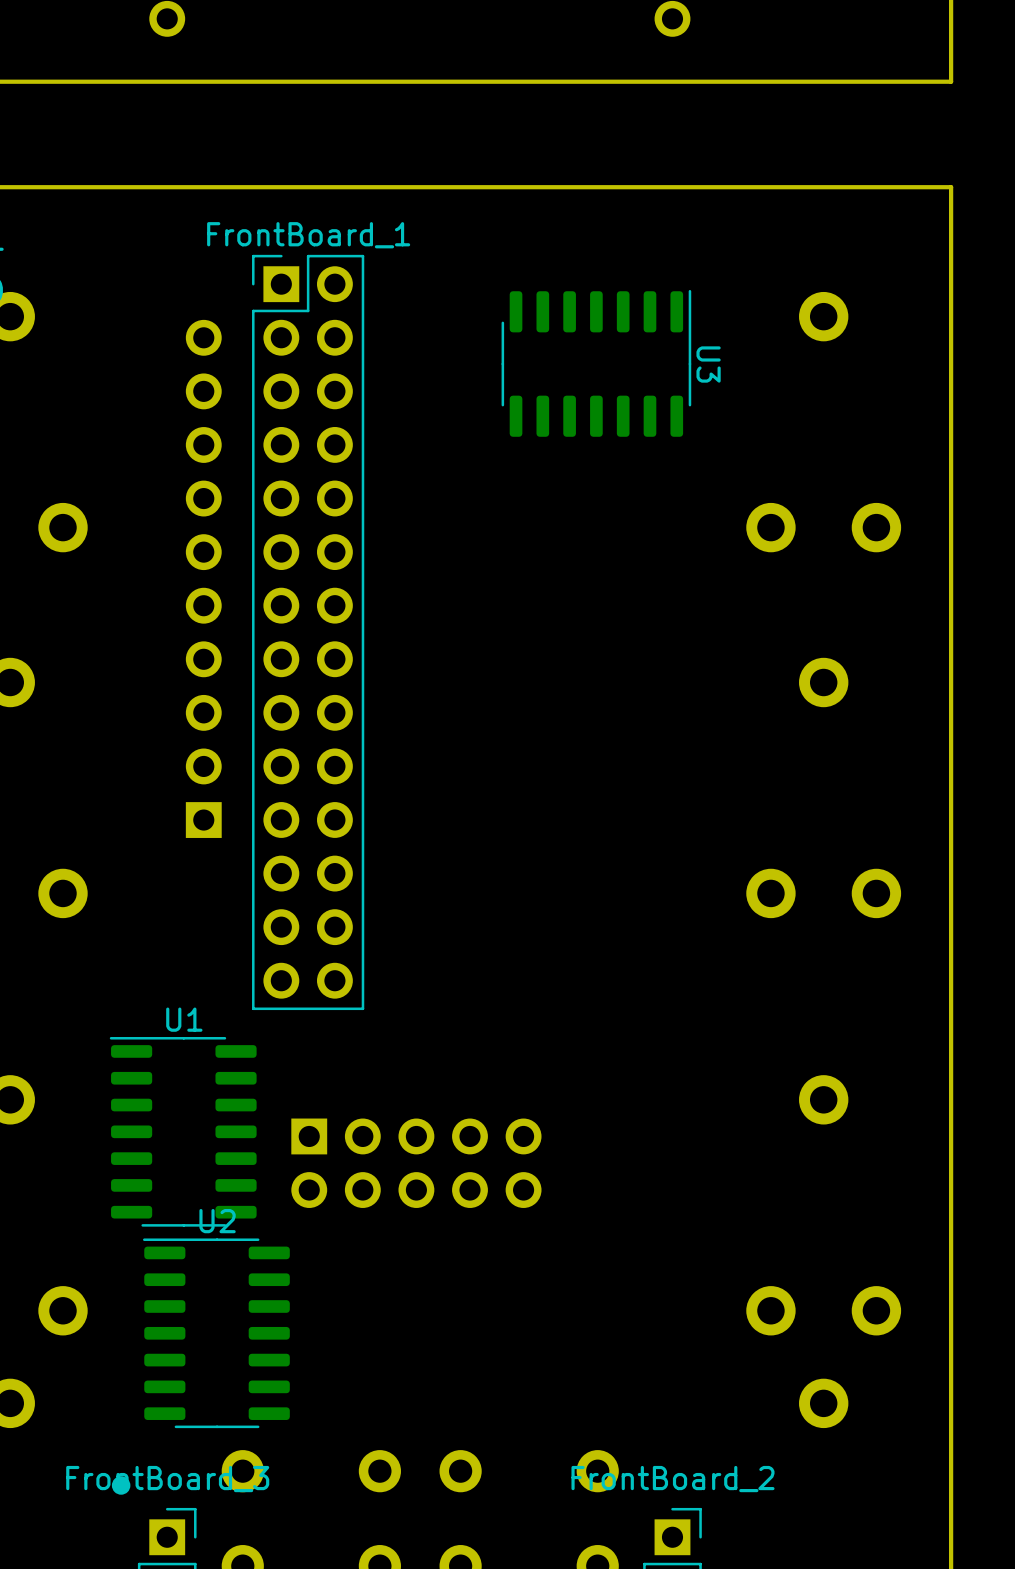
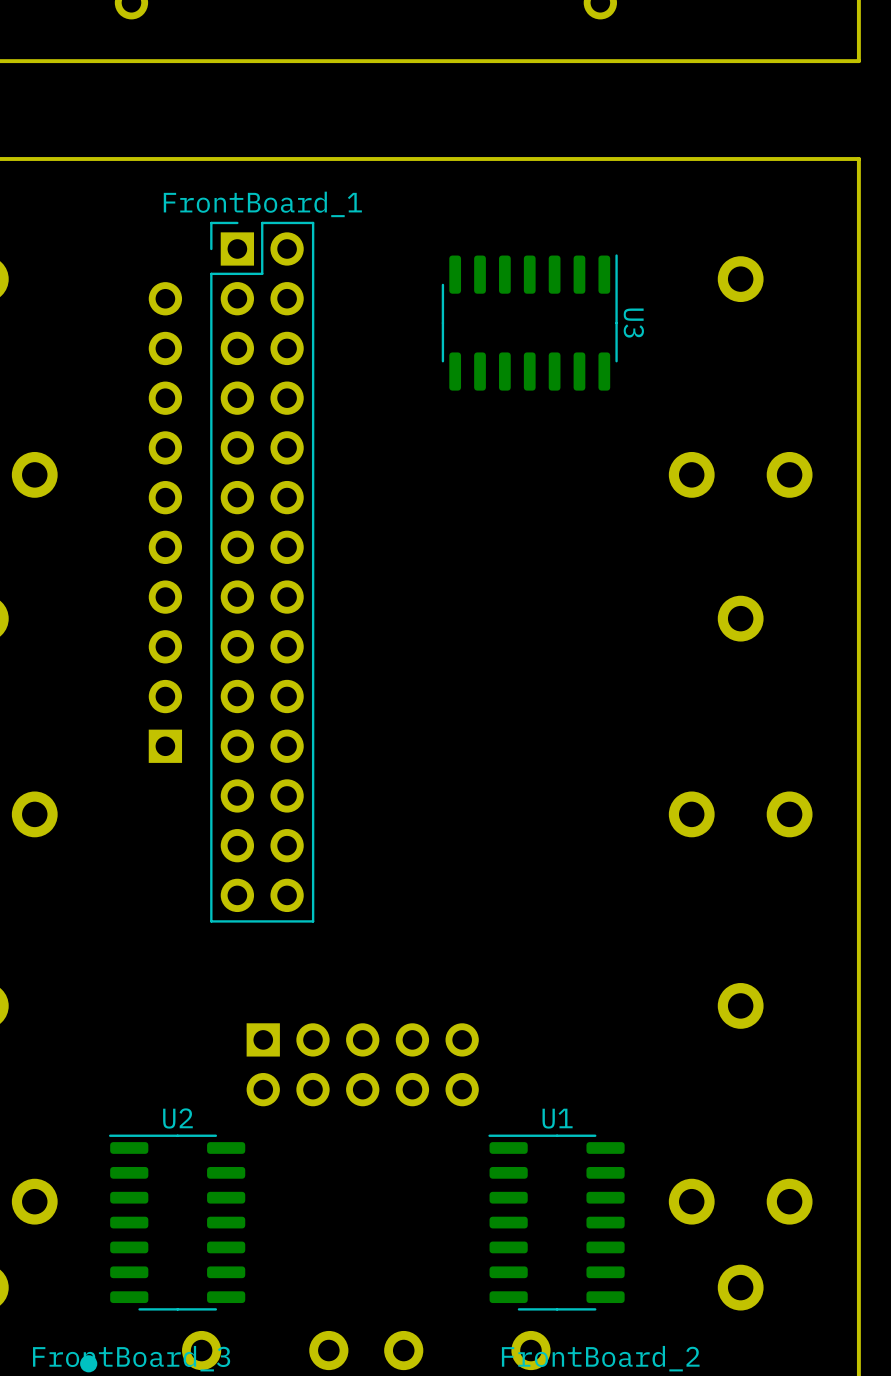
U1 position: (183, 1131) -> (556, 1222)

